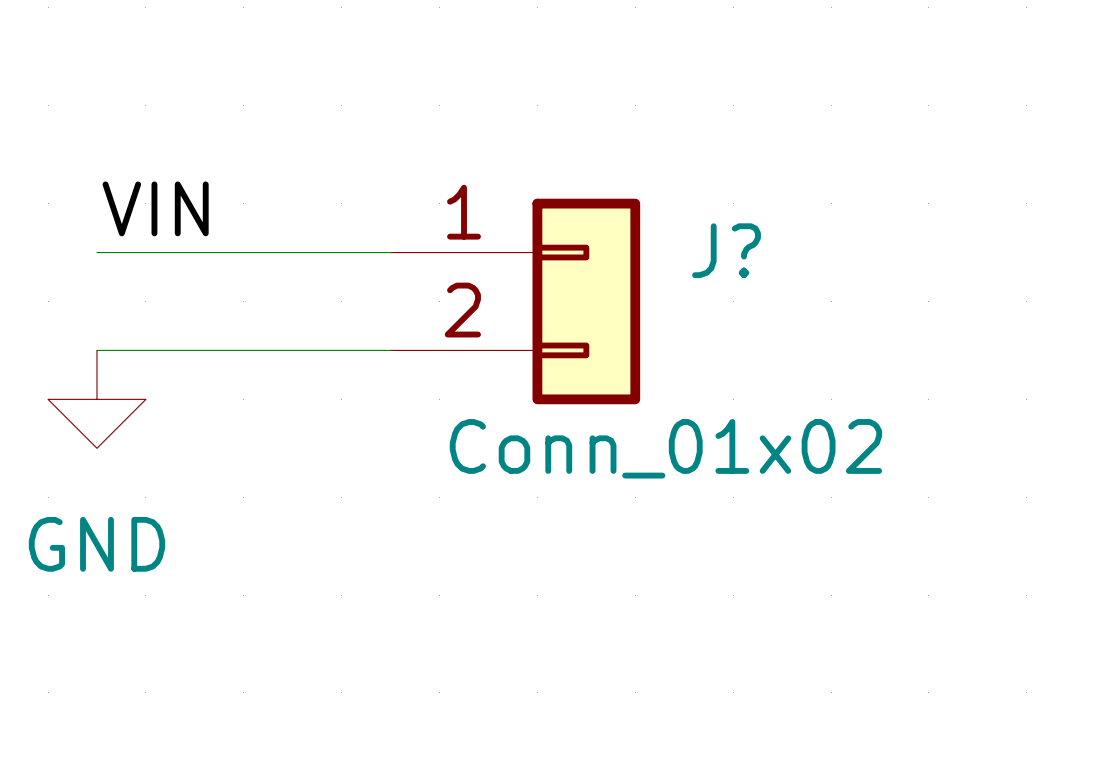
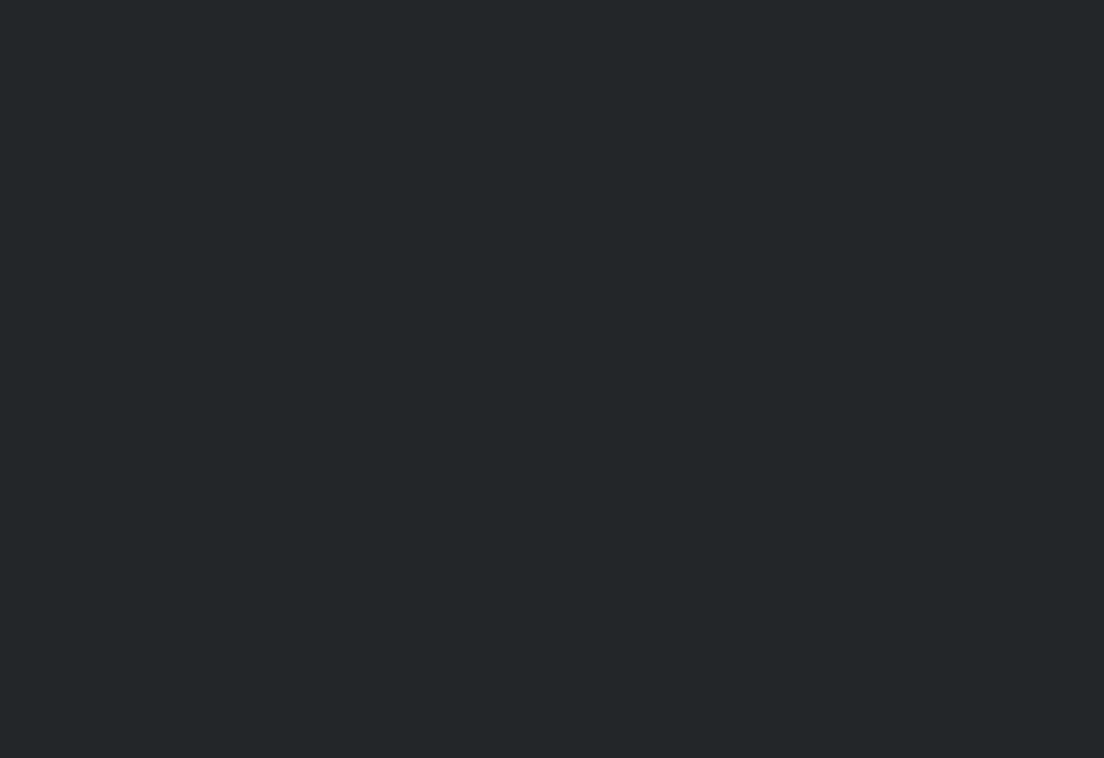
label: VIN (155, 208) -> none
wire: (96, 252) (390, 252) -> none
J?: Conn_01x02 (515, 301) -> none
wire: (96, 350) (390, 350) -> none
power symbol: GND (96, 399) -> none

